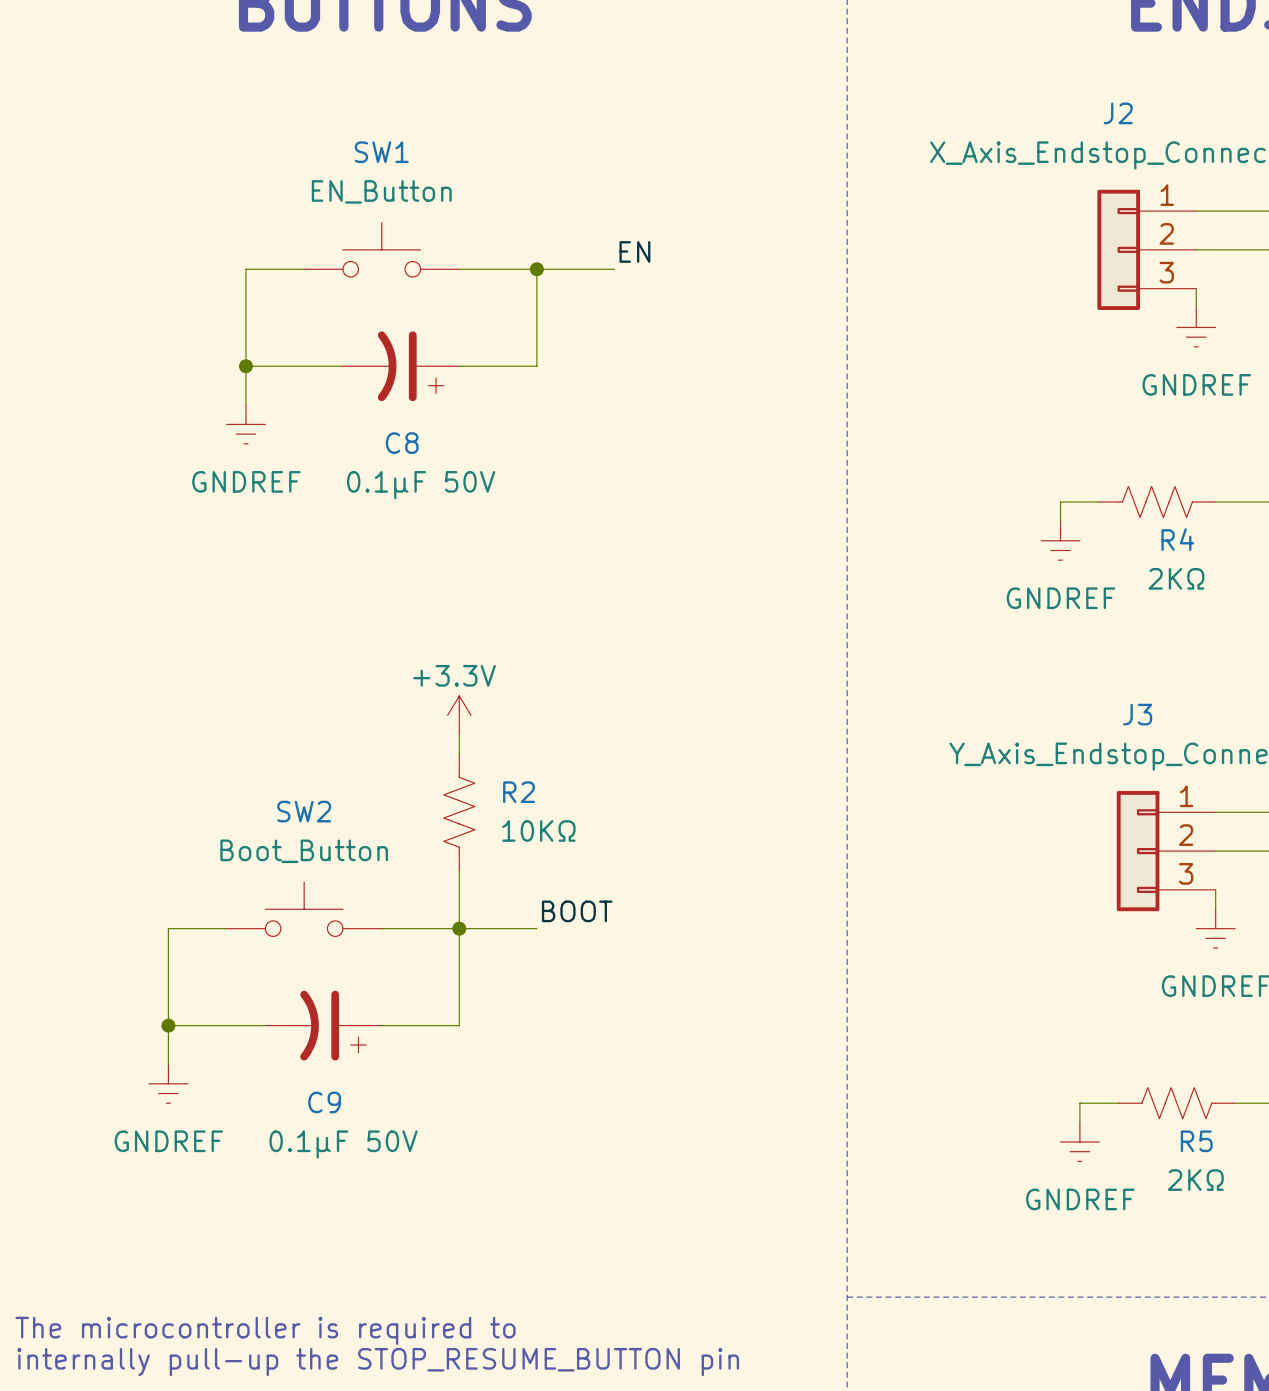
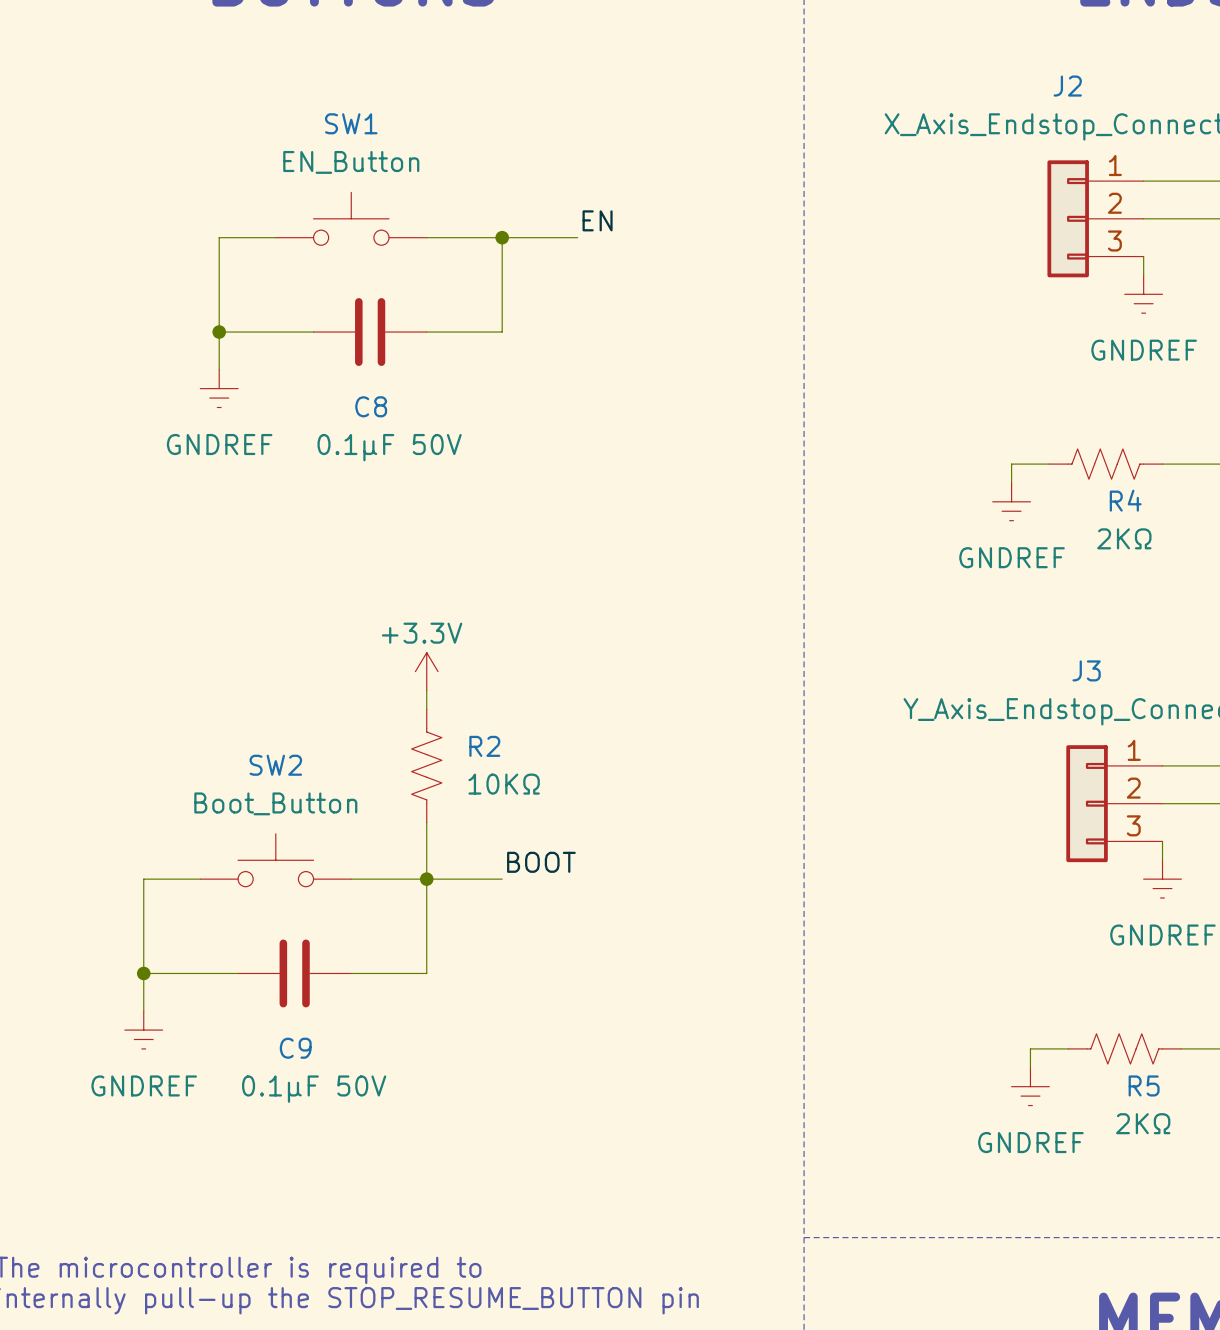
C8 symbol: [342, 331, 460, 402] -> [313, 298, 427, 366]
C9 symbol: [265, 990, 382, 1061] -> [238, 939, 352, 1008]

